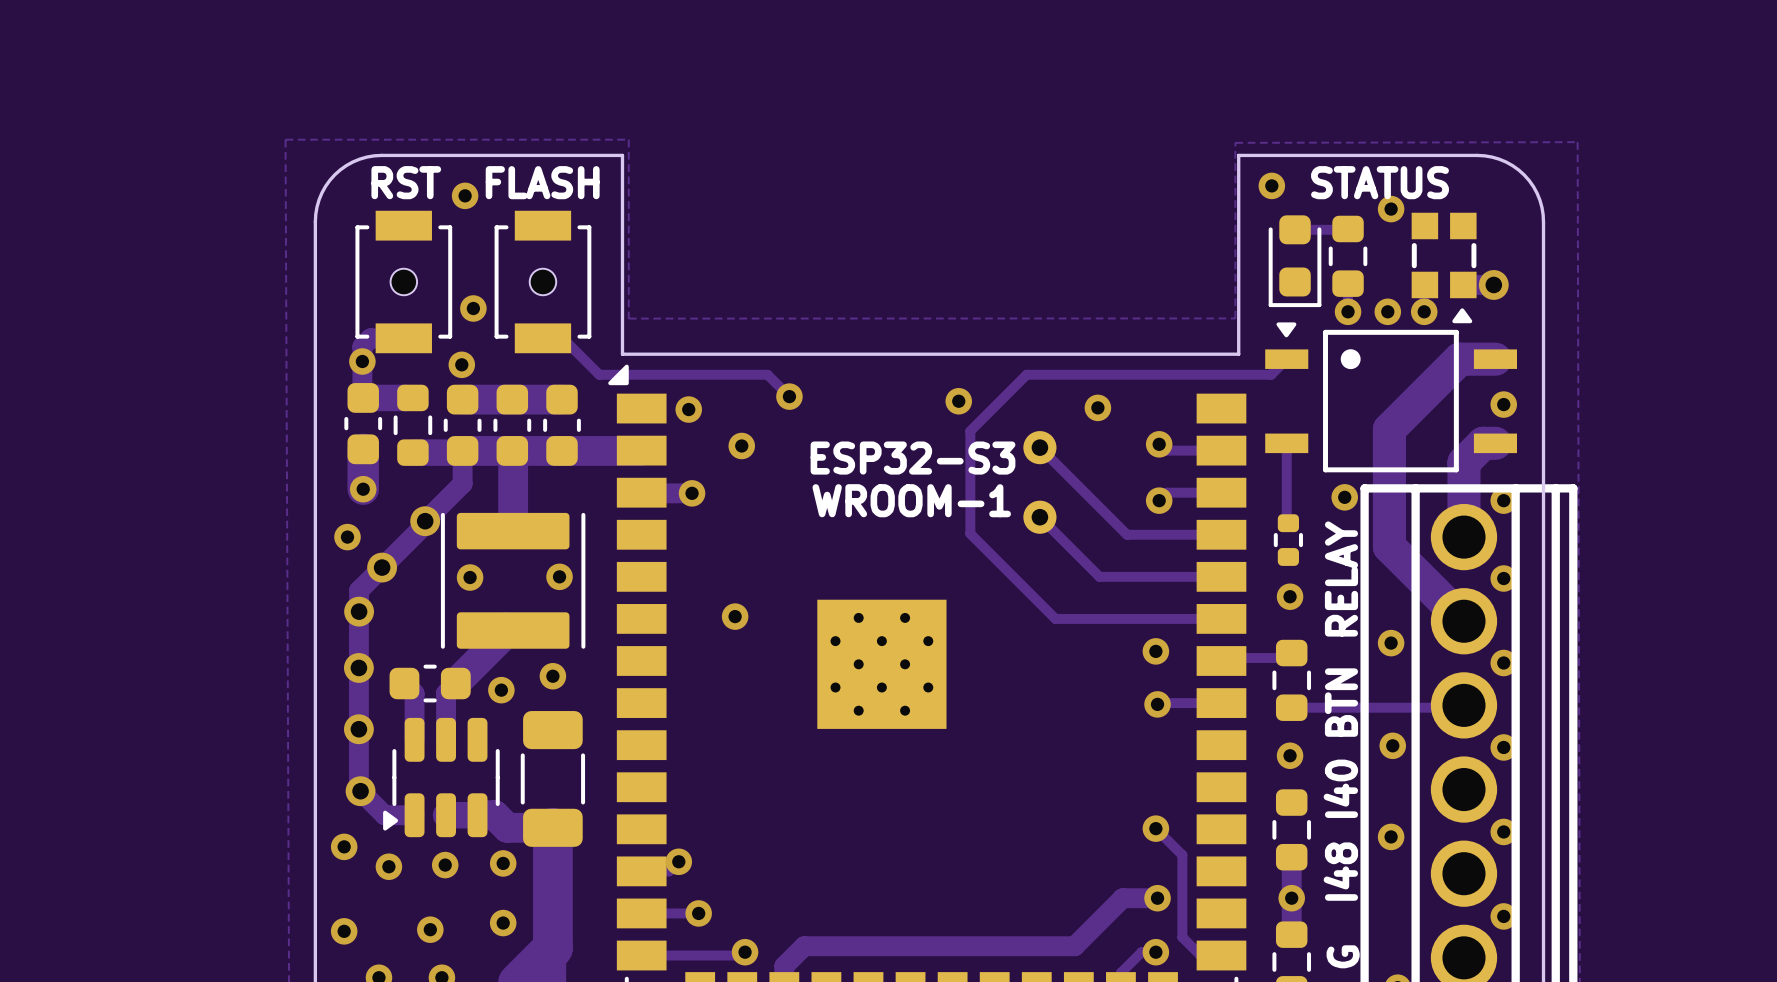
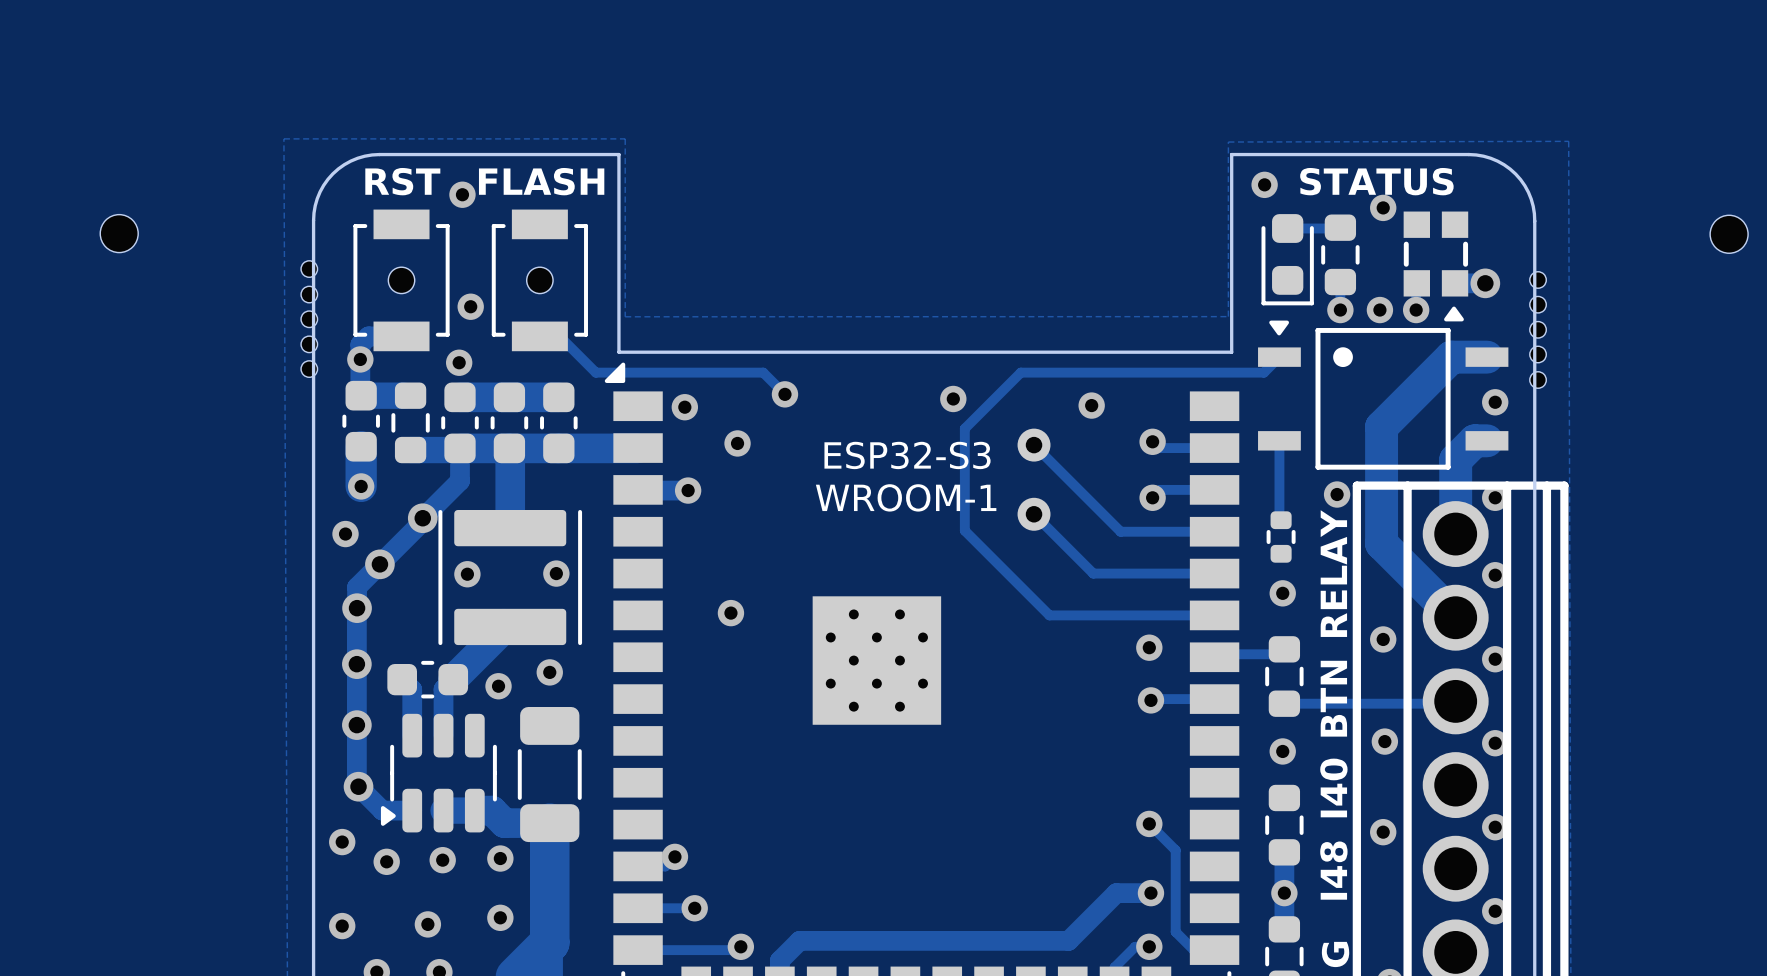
part: none -> (119, 233)
part: none -> (1729, 234)
part: none -> (309, 319)
part: none -> (1538, 330)

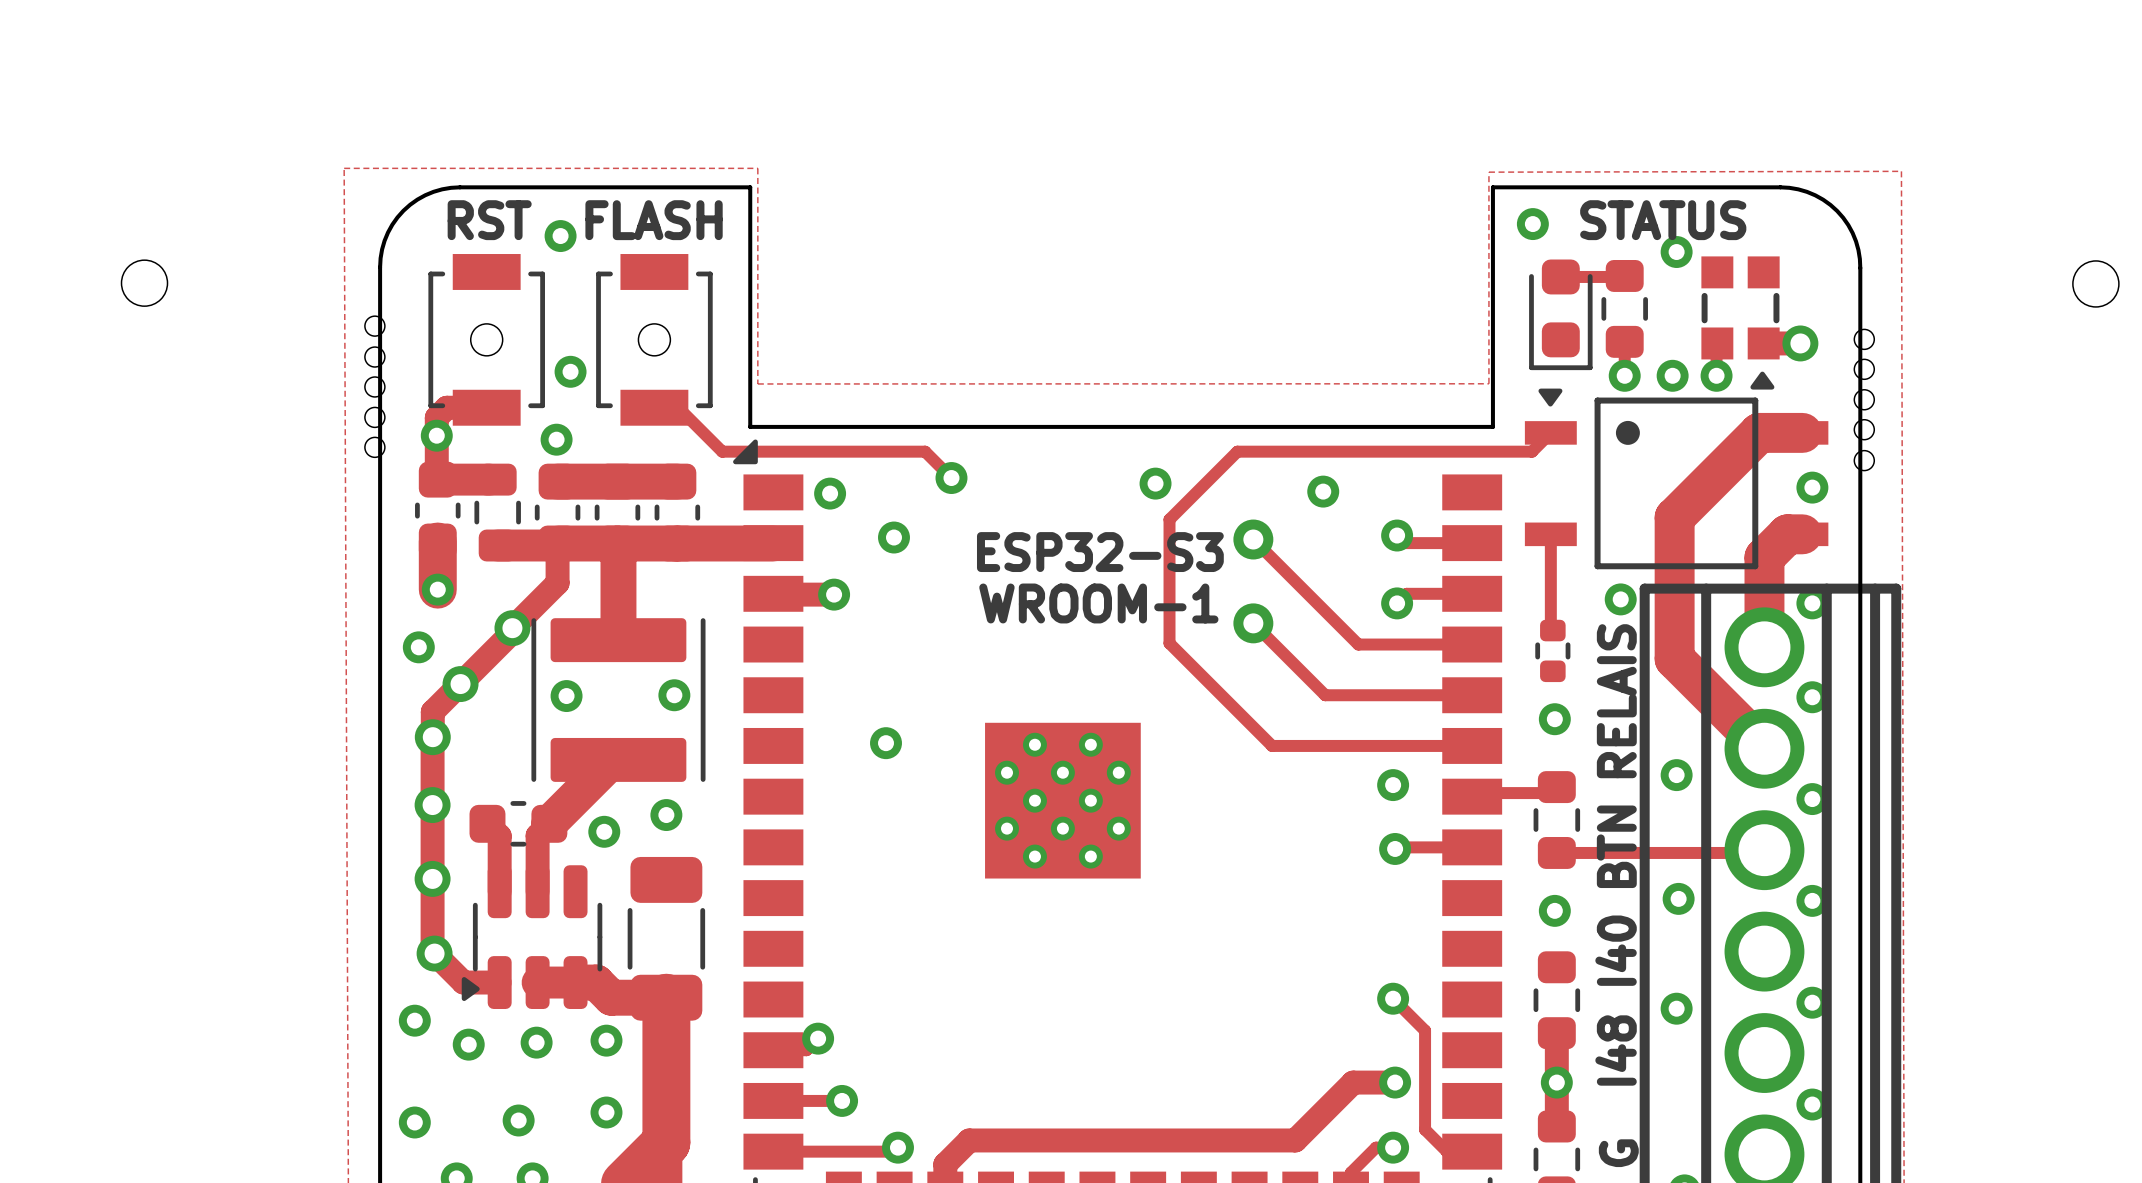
text: RELAY (1333, 573) -> RELAIS (1616, 701)

